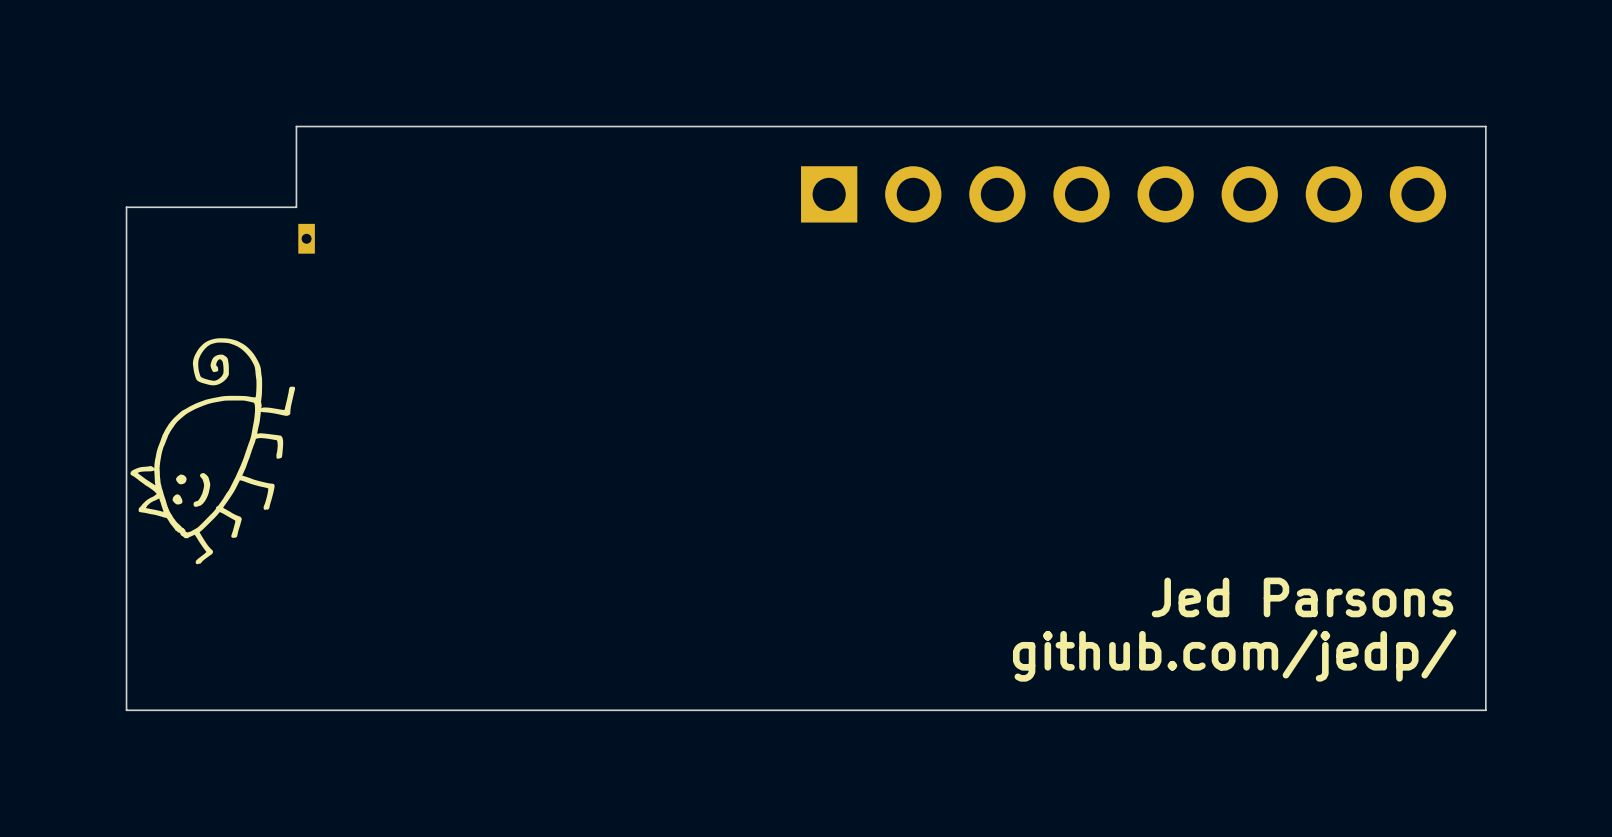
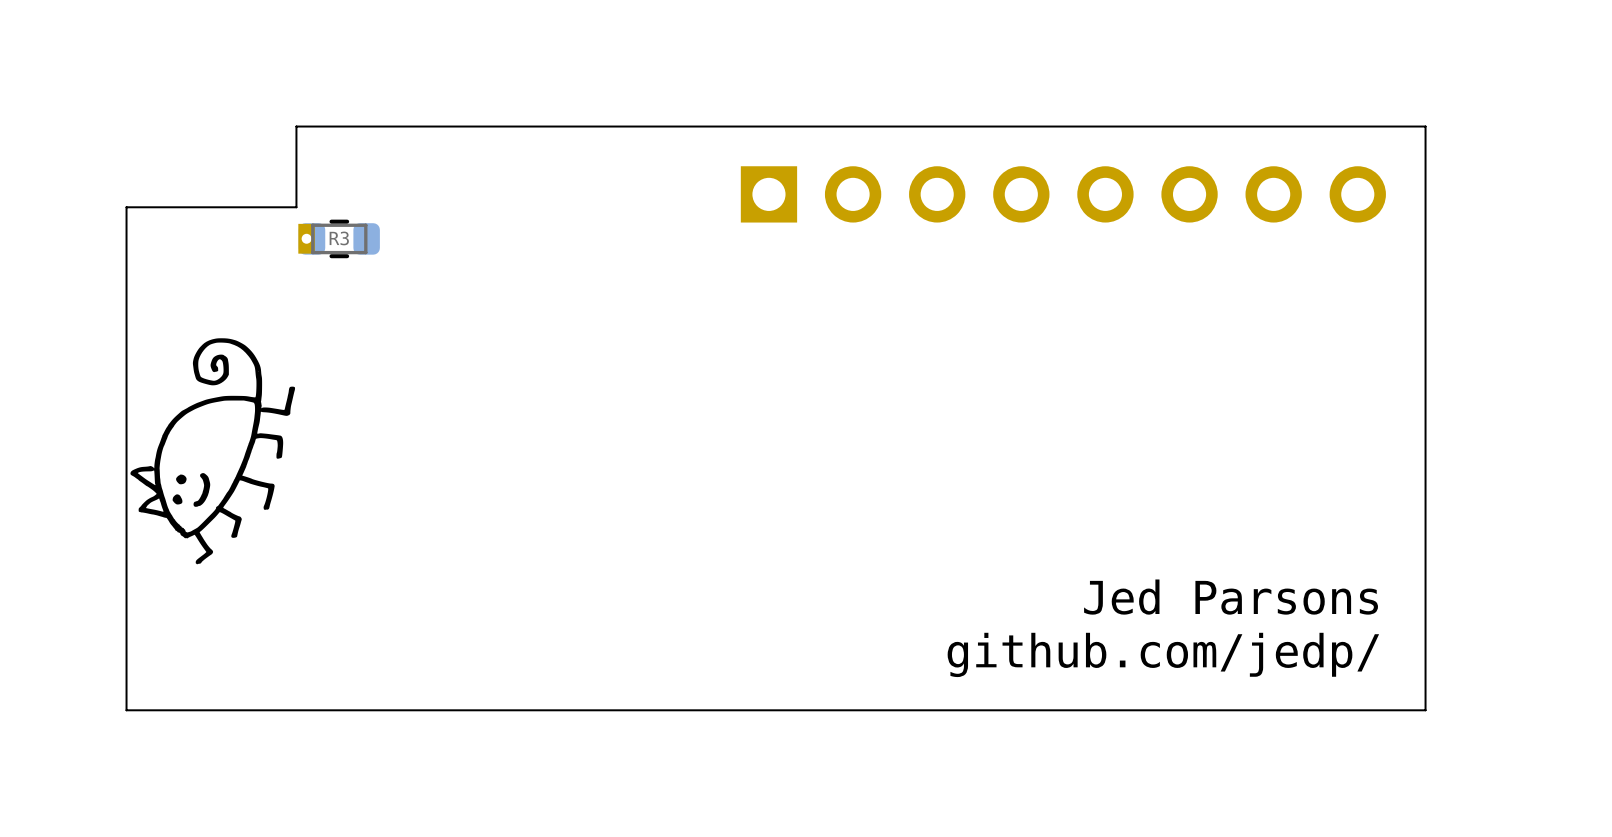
board edge: (1425, 126) (1485, 126) (1485, 710) (1425, 710) -> (1425, 126) (1425, 710)
part position: (1123, 194) -> (1063, 194)
R3: none -> (339, 238)
text position: Jed Parsons (1302, 597) -> Jed Parsons (1231, 597)
text position: github.com/jedp/ (1234, 655) -> github.com/jedp/ (1163, 654)

